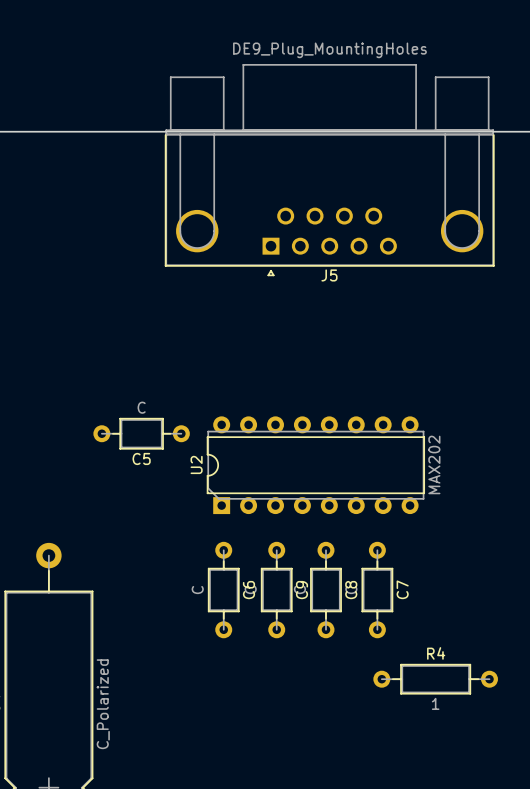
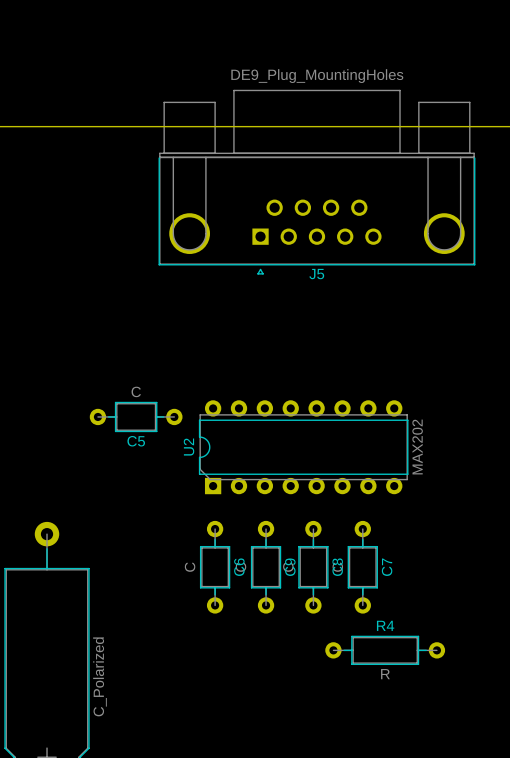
J5 footprint: [164, 64, 495, 276] -> [158, 89, 476, 275]
R4 position: (435, 679) -> (385, 650)
R4 value: 1 (435, 703) -> R (385, 674)

